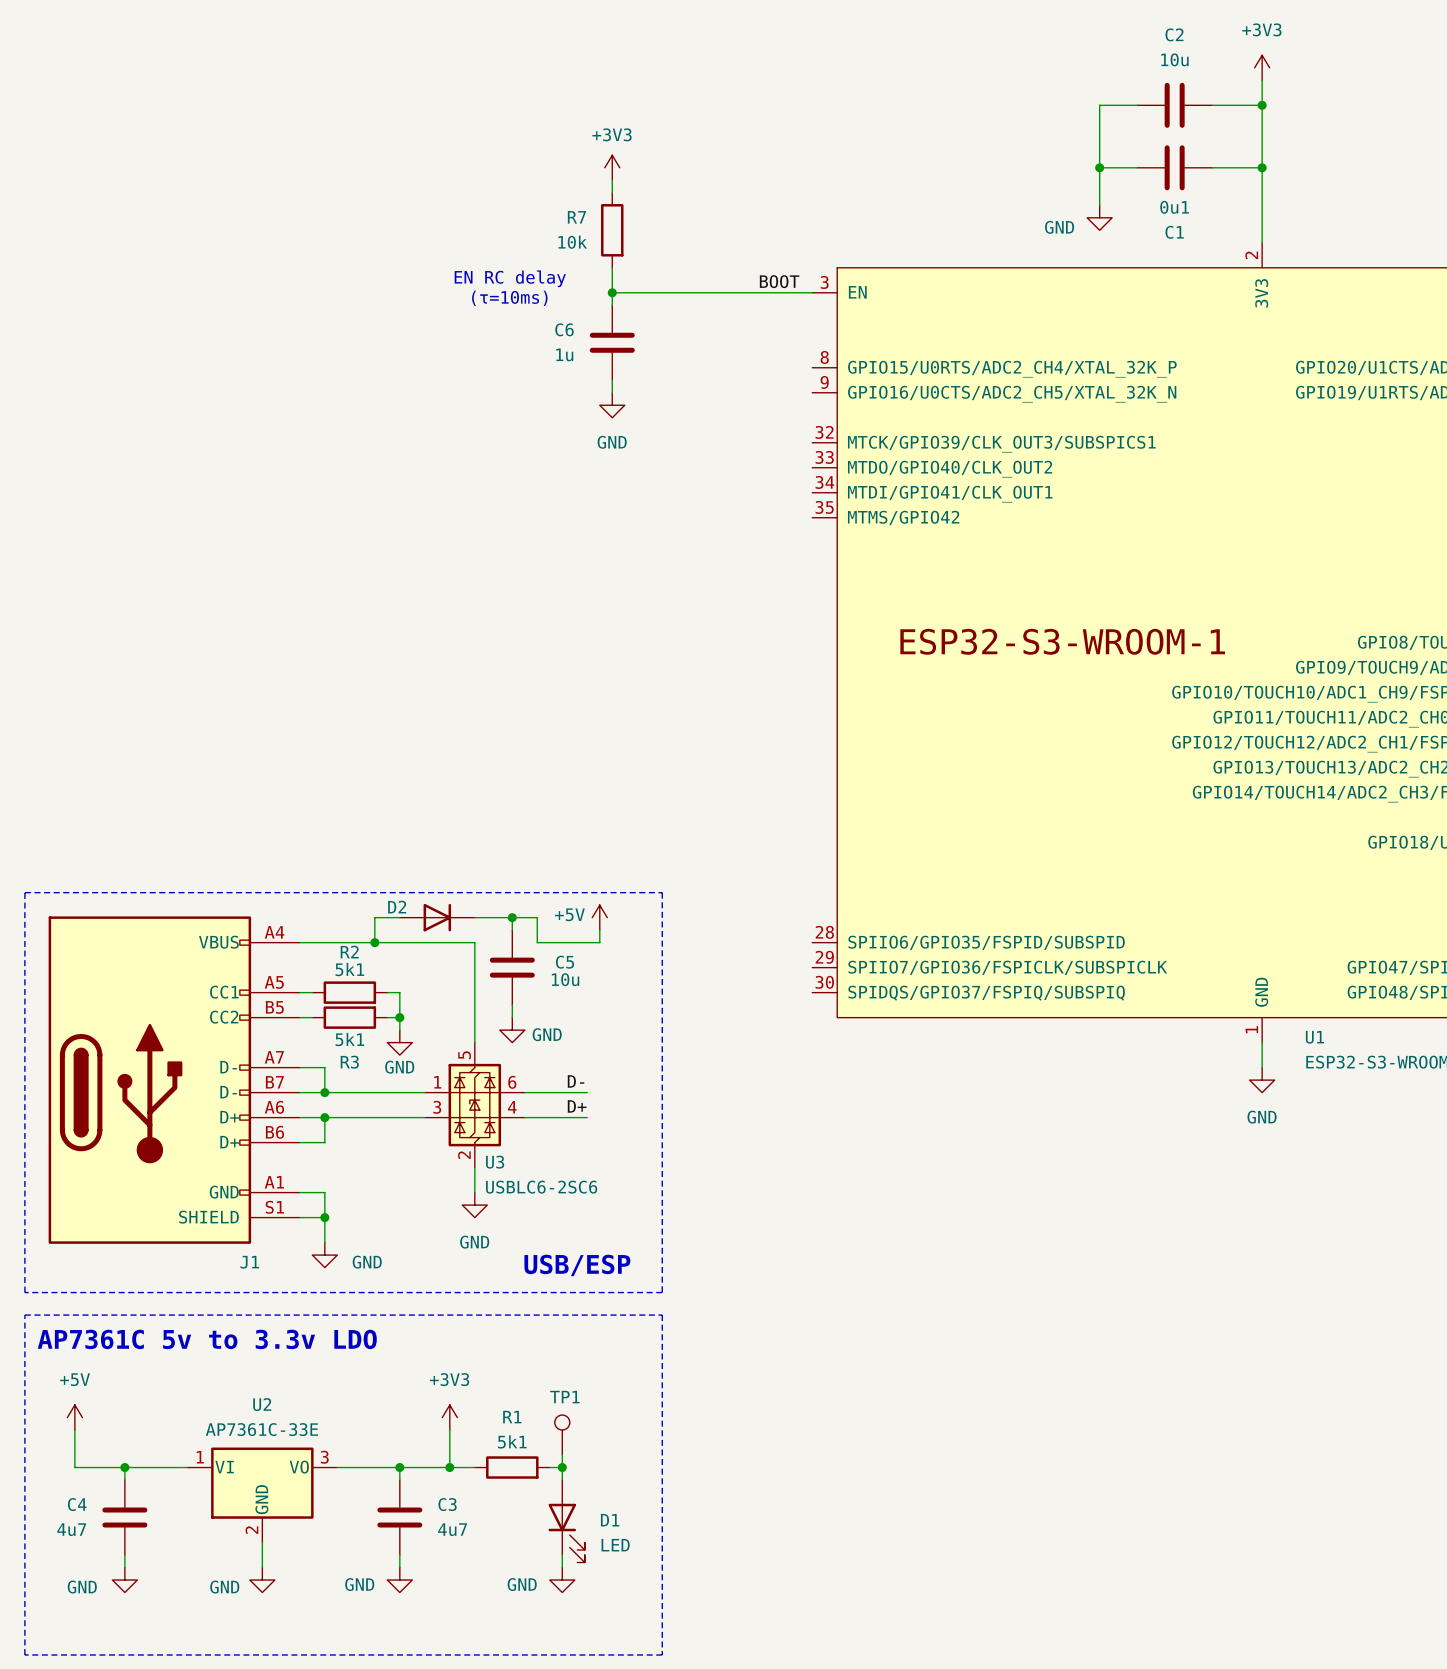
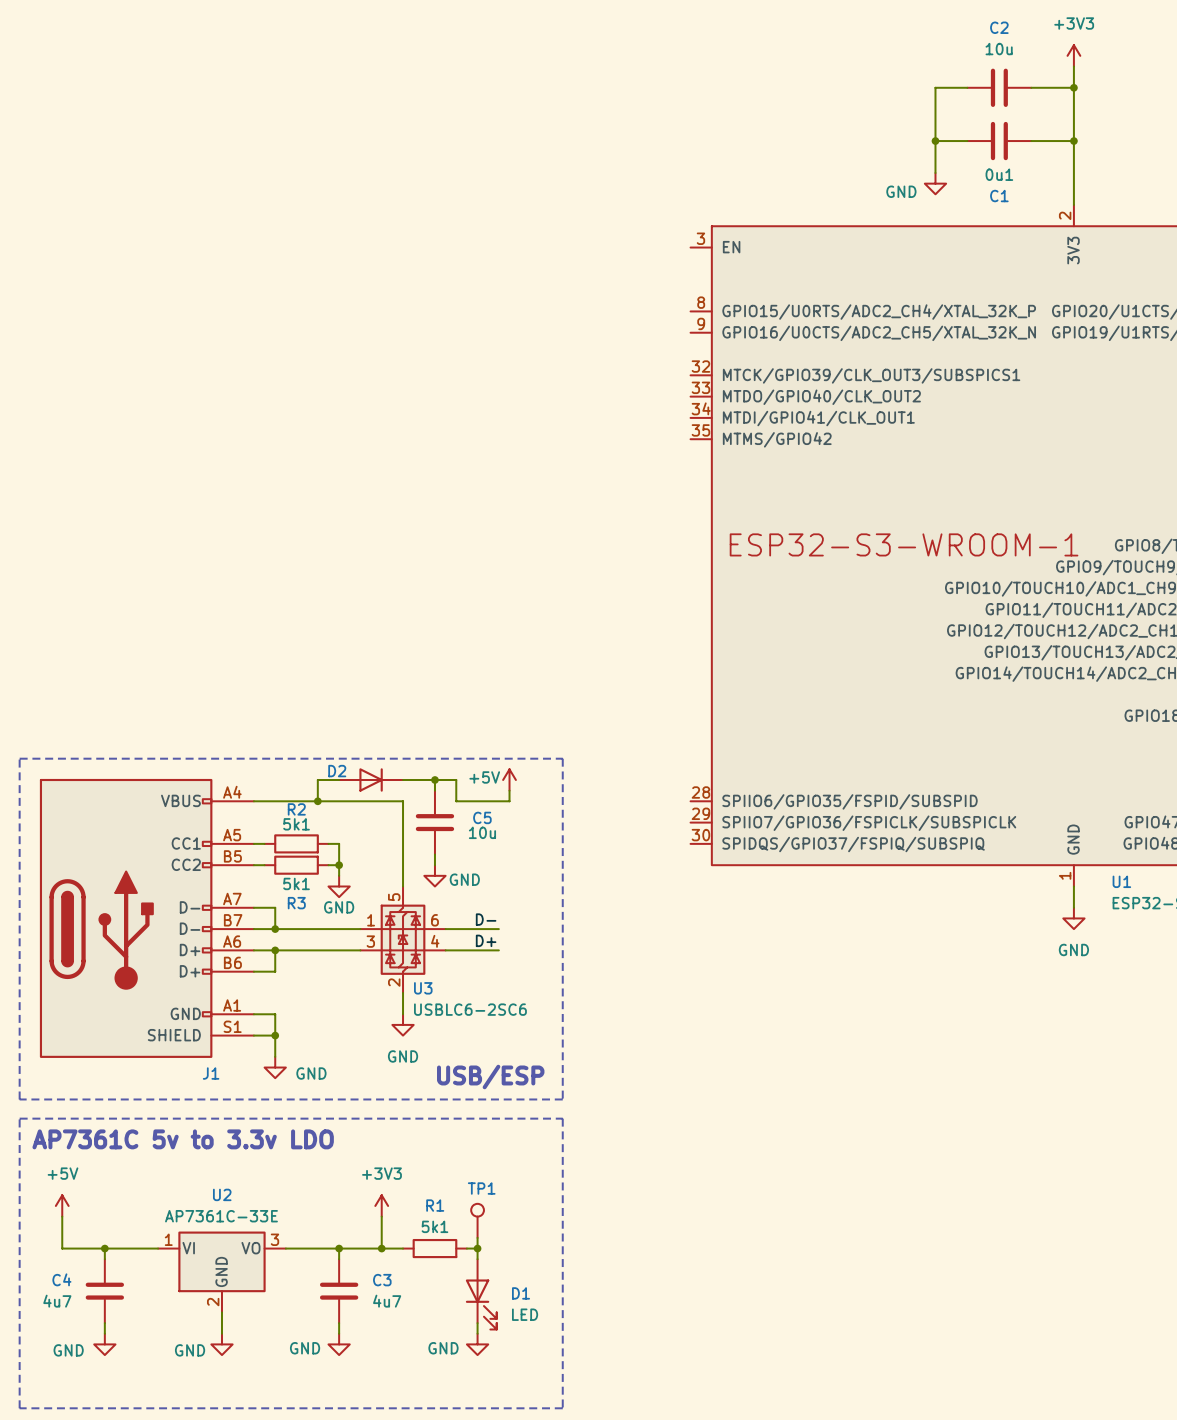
power symbol: +3V3 (612, 167) -> none
wire: (612, 180) (612, 192) -> none
R7: 10k (612, 230) -> none
wire: (612, 267) (612, 305) -> none
text: EN RC delay (510, 278) -> none
label: BOOT (779, 281) -> none
wire: (612, 292) (812, 292) -> none
junction: (612, 292) -> none
text: (τ=10ms) (509, 298) -> none
C6: 1u (612, 342) -> none
wire: (612, 380) (612, 392) -> none
power symbol: GND (612, 405) -> none

